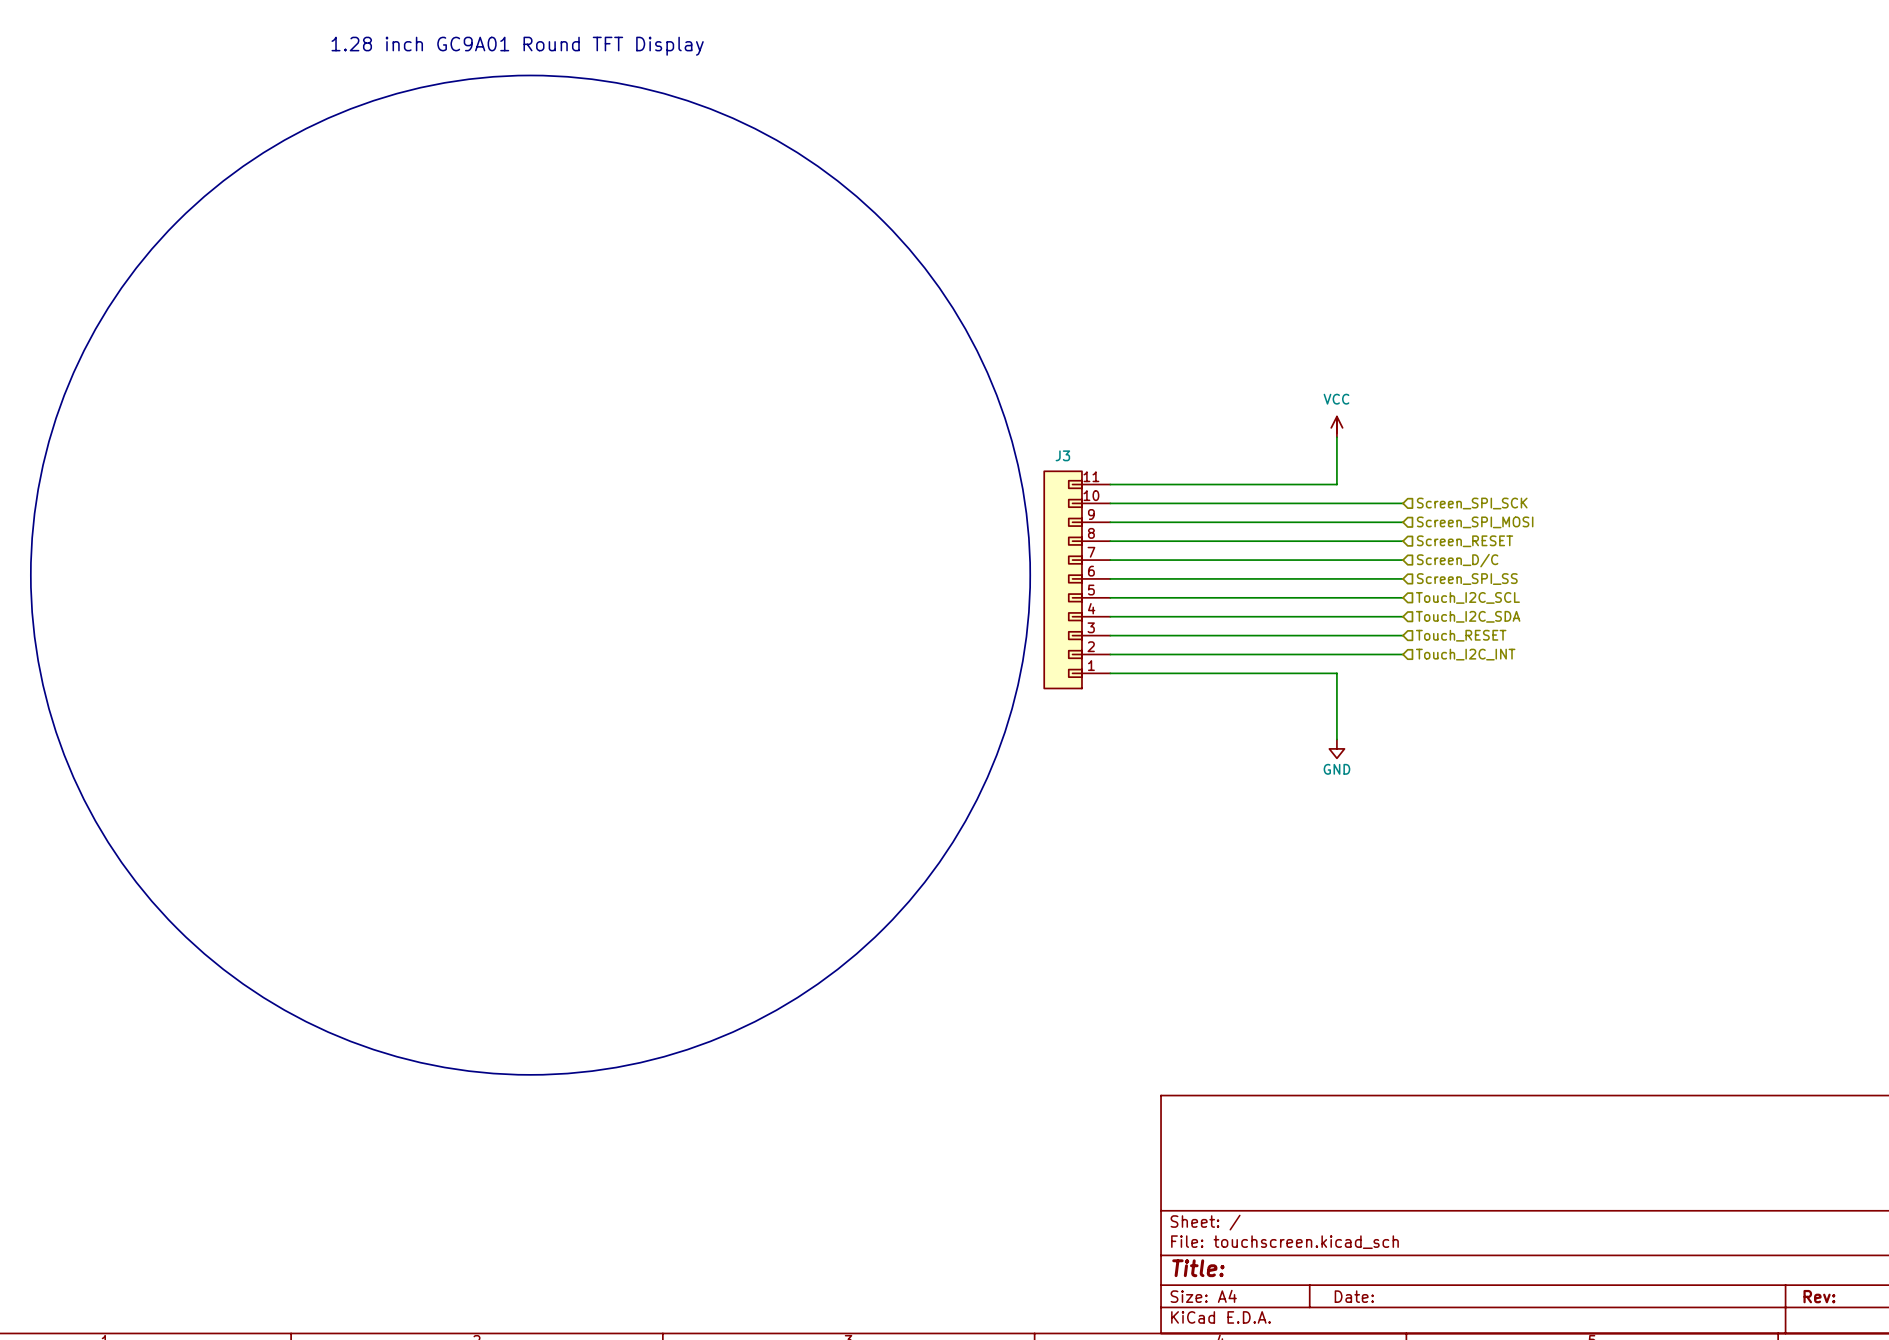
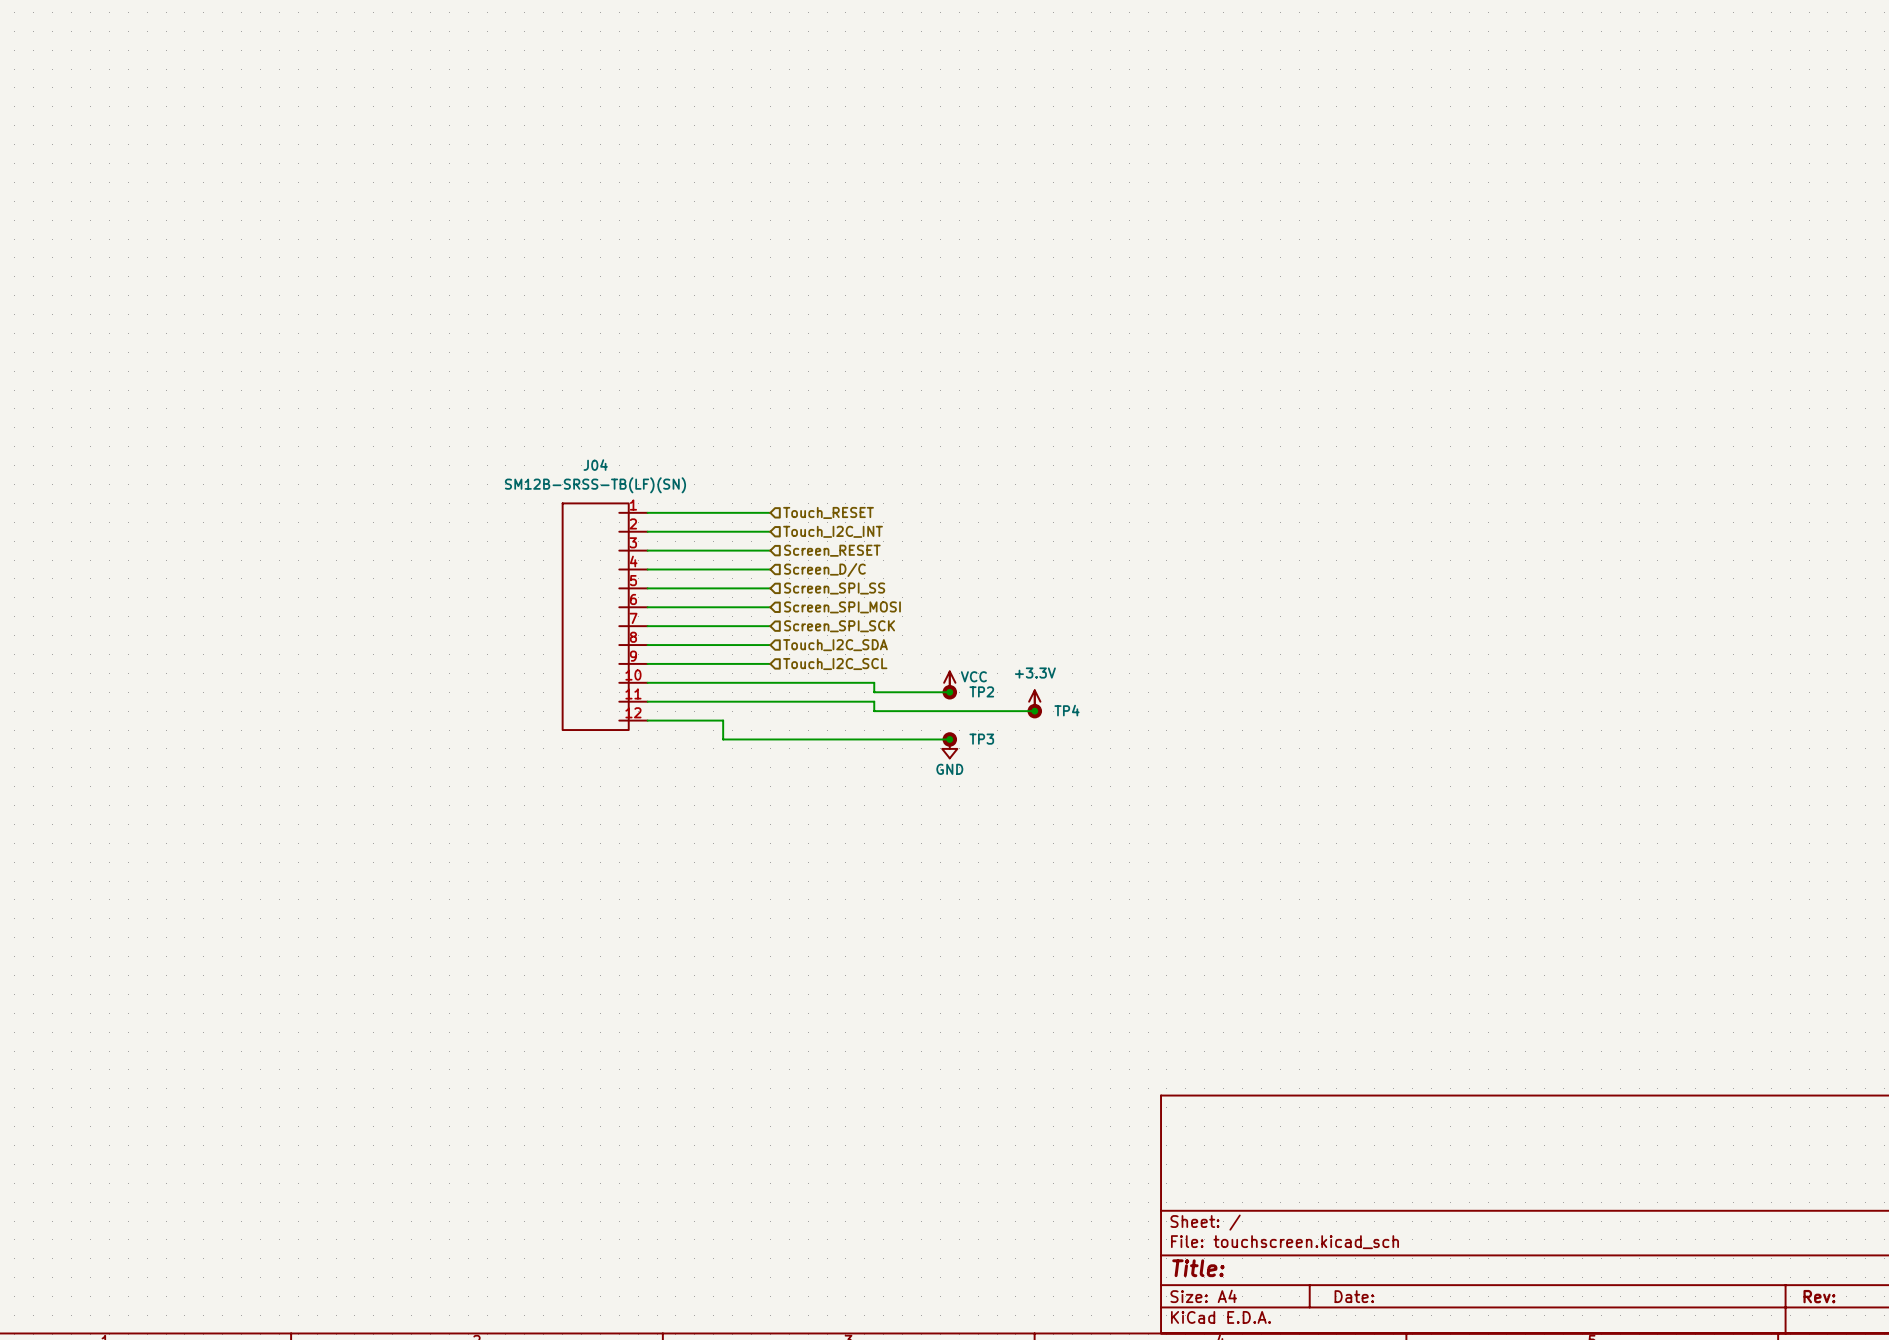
text: 1.28 inch GC9A01 Round TFT Display (517, 46) -> none
drawing: [30, 75, 1031, 1075] -> none
power symbol: VCC (1336, 426) -> none
wire: (1336, 437) (1336, 484) (1110, 484) -> none
wire: (1110, 503) (1403, 503) -> none
hierarchical label: Screen_SPI_SCK (1472, 503) -> none
wire: none -> (647, 512) (770, 512)
hierarchical label: none -> Touch_RESET (828, 512)
wire: (1110, 522) (1403, 522) -> none
hierarchical label: Screen_SPI_MOSI (1475, 522) -> none
wire: none -> (647, 531) (770, 531)
hierarchical label: none -> Touch_I2C_INT (833, 531)
wire: (1110, 541) (1403, 541) -> none
hierarchical label: Screen_RESET (1465, 541) -> none
wire: none -> (647, 550) (770, 550)
hierarchical label: none -> Screen_RESET (832, 550)
wire: (1110, 560) (1403, 560) -> none
hierarchical label: Screen_D/C (1457, 560) -> none
wire: none -> (647, 569) (770, 569)
hierarchical label: none -> Screen_D/C (824, 570)
wire: (1110, 578) (1403, 578) -> none
J3: (1077, 579) -> none
hierarchical label: Screen_SPI_SS (1467, 579) -> none
wire: none -> (647, 588) (770, 588)
hierarchical label: none -> Screen_SPI_SS (834, 588)
wire: (1110, 597) (1403, 597) -> none
hierarchical label: Touch_I2C_SCL (1467, 597) -> none
wire: none -> (647, 607) (770, 607)
hierarchical label: none -> Screen_SPI_MOSI (842, 607)
J04: none -> SM12B-SRSS-TB(LF)(SN) (605, 616)
wire: (1110, 616) (1403, 616) -> none
hierarchical label: Touch_I2C_SDA (1468, 616) -> none
wire: none -> (647, 626) (770, 626)
hierarchical label: none -> Screen_SPI_SCK (839, 626)
wire: (1110, 635) (1403, 635) -> none
hierarchical label: Touch_RESET (1461, 635) -> none
wire: none -> (647, 645) (770, 645)
hierarchical label: none -> Touch_I2C_SDA (835, 645)
wire: (1110, 654) (1403, 654) -> none
hierarchical label: Touch_I2C_INT (1465, 654) -> none
wire: none -> (647, 663) (770, 663)
hierarchical label: none -> Touch_I2C_SCL (835, 664)
wire: (1110, 673) (1336, 673) (1336, 739) -> none
power symbol: none -> VCC (949, 681)
wire: none -> (647, 682) (874, 682) (874, 692) (949, 692)
TP2: none -> (949, 692)
junction: none -> (949, 692)
power symbol: none -> +3.3V (1034, 700)
wire: none -> (647, 701) (874, 701) (874, 711) (1034, 711)
TP4: none -> (1034, 711)
junction: none -> (1034, 711)
wire: none -> (647, 720) (723, 720) (723, 739) (949, 739)
TP3: none -> (949, 739)
junction: none -> (949, 739)
power symbol: none -> GND (949, 748)
power symbol: GND (1336, 748) -> none

